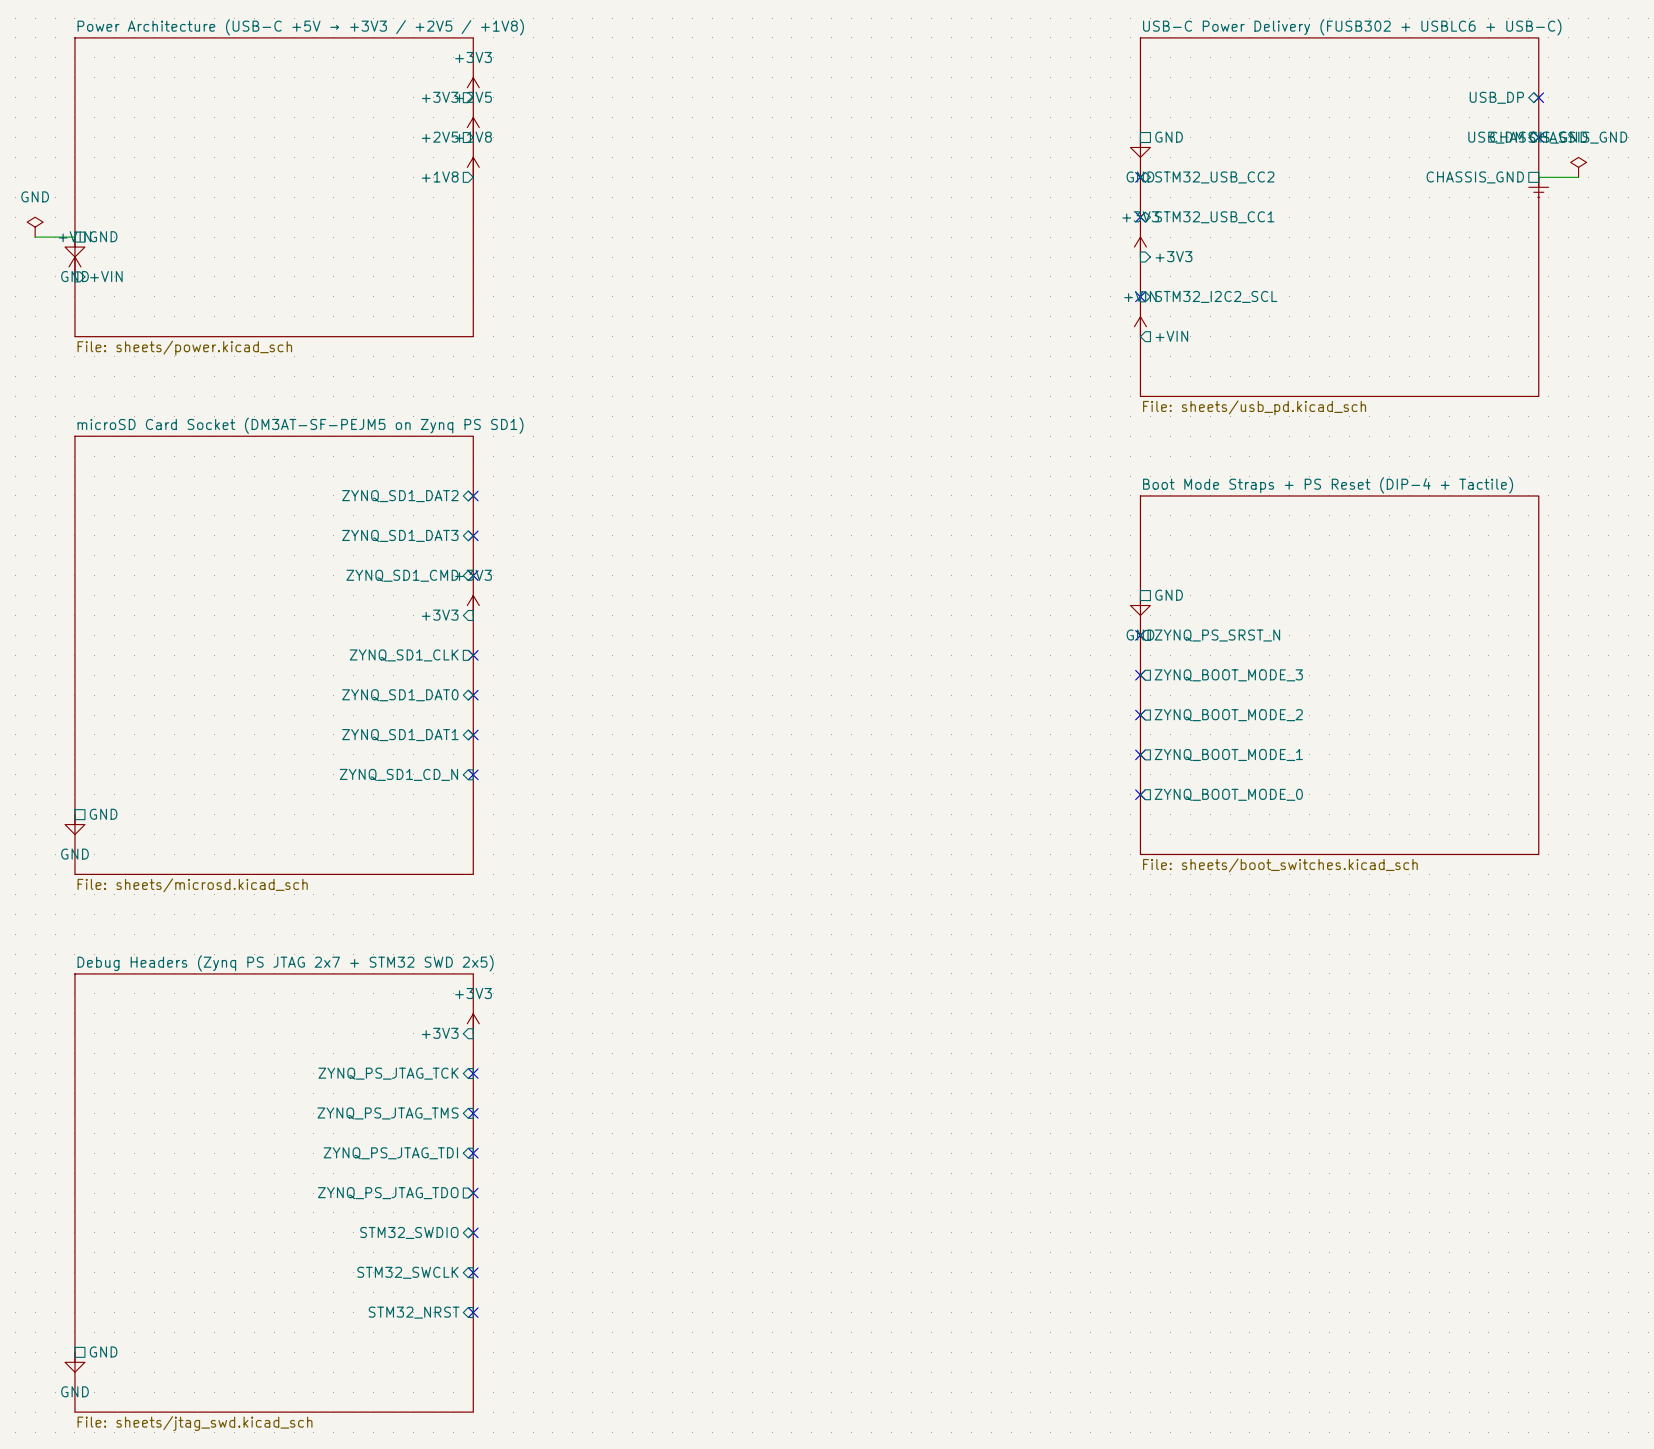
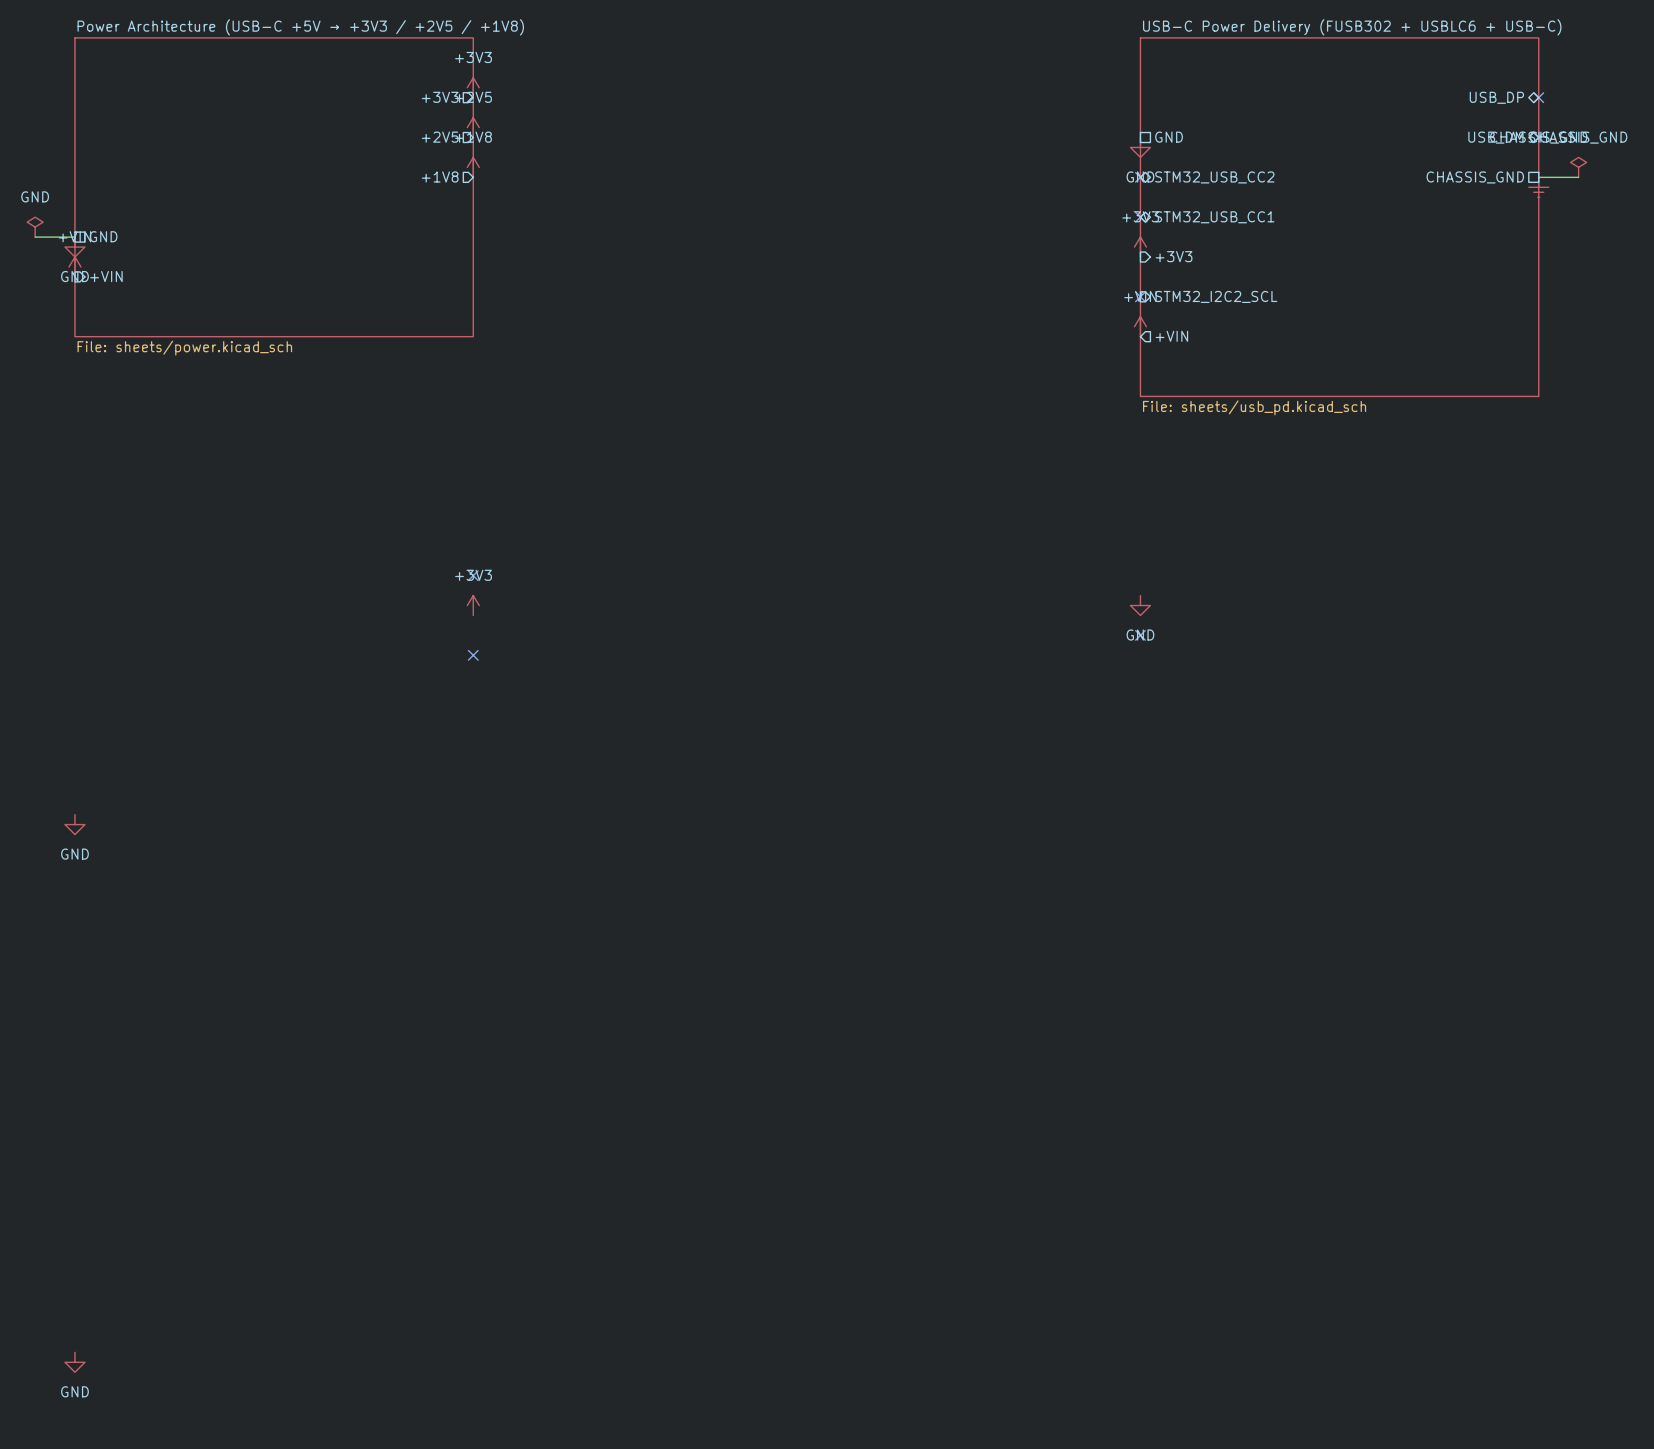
no-connect mark: (473, 495) -> none
sheet pin: ZYNQ_SD1_DAT2 (400, 496) -> none
sheet pin: ZYNQ_SD1_DAT3 (400, 535) -> none
no-connect mark: (473, 535) -> none
sheet pin: ZYNQ_SD1_CMD (402, 575) -> none
sheet pin: GND (1169, 595) -> none
sheet pin: +3V3 (440, 615) -> none
sheet pin: ZYNQ_PS_SRST_N (1217, 635) -> none
sheet microSD Card Socket (DM3AT-SF-PEJM5 on Zynq PS SD1): File: sheets/microsd.kicad_sch (274, 655) -> none
sheet pin: ZYNQ_SD1_CLK (404, 655) -> none
no-connect mark: (1140, 675) -> none
sheet pin: ZYNQ_BOOT_MODE_3 (1228, 675) -> none
sheet Boot Mode Straps + PS Reset (DIP-4 + Tactile): File: sheets/boot_switches.kicad_sch (1339, 675) -> none
sheet pin: ZYNQ_SD1_DAT0 (400, 695) -> none
no-connect mark: (473, 695) -> none
no-connect mark: (1140, 715) -> none
sheet pin: ZYNQ_BOOT_MODE_2 (1228, 715) -> none
no-connect mark: (473, 734) -> none
sheet pin: ZYNQ_SD1_DAT1 (400, 735) -> none
no-connect mark: (1140, 754) -> none
sheet pin: ZYNQ_BOOT_MODE_1 (1228, 754) -> none
sheet pin: ZYNQ_SD1_CD_N (398, 774) -> none
no-connect mark: (473, 774) -> none
no-connect mark: (1140, 794) -> none
sheet pin: ZYNQ_BOOT_MODE_0 (1228, 794) -> none
sheet pin: GND (103, 814) -> none
power symbol: +3V3 (473, 1023) -> none
sheet pin: +3V3 (440, 1033) -> none
sheet pin: ZYNQ_PS_JTAG_TCK (388, 1073) -> none
no-connect mark: (473, 1073) -> none
sheet pin: ZYNQ_PS_JTAG_TMS (388, 1113) -> none
no-connect mark: (473, 1113) -> none
sheet pin: ZYNQ_PS_JTAG_TDI (390, 1153) -> none
no-connect mark: (473, 1153) -> none
sheet Debug Headers (Zynq PS JTAG 2x7 + STM32 SWD 2x5): File: sheets/jtag_swd.kicad_sch (274, 1193) -> none
sheet pin: ZYNQ_PS_JTAG_TDO (388, 1193) -> none
no-connect mark: (473, 1193) -> none
sheet pin: STM32_SWDIO (409, 1232) -> none
no-connect mark: (473, 1232) -> none
sheet pin: STM32_SWCLK (407, 1272) -> none
no-connect mark: (473, 1272) -> none
sheet pin: STM32_NRST (414, 1312) -> none
no-connect mark: (473, 1312) -> none
sheet pin: GND (103, 1351) -> none

